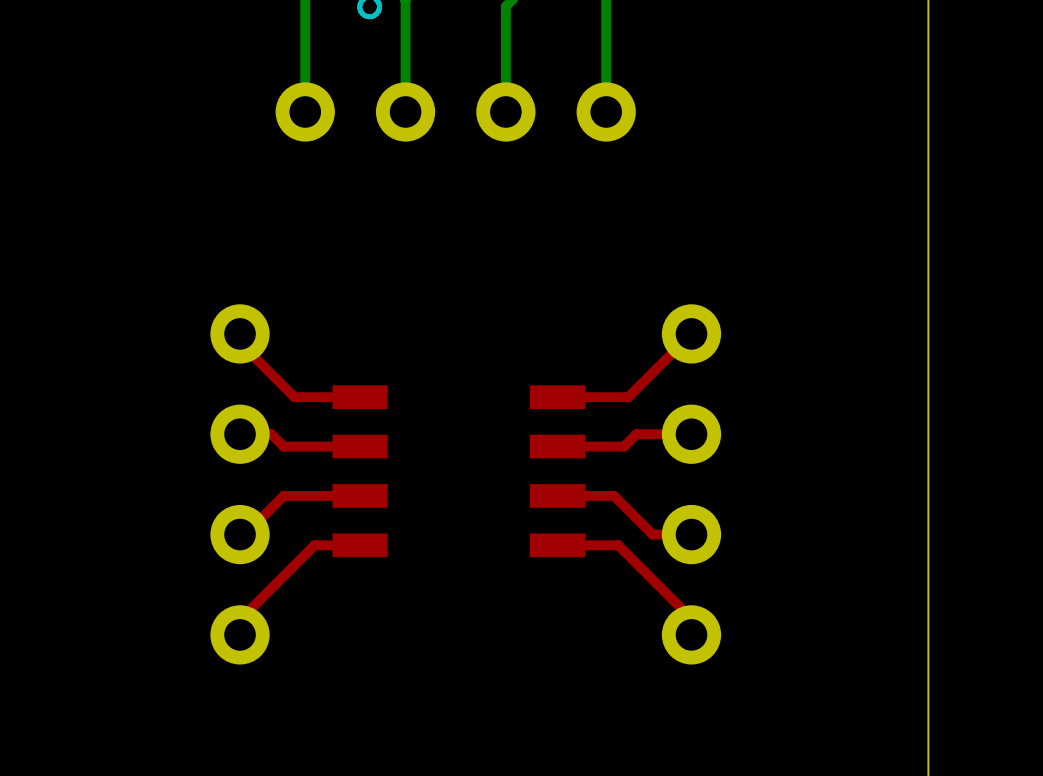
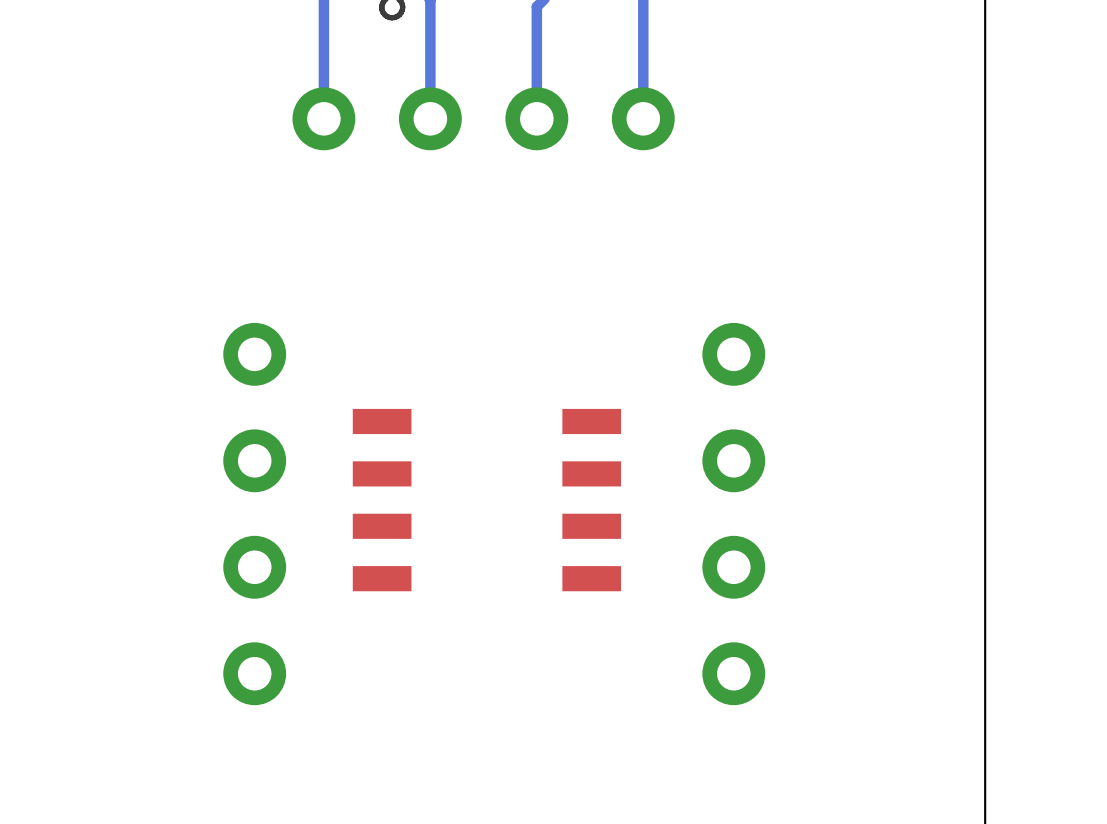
top track: (240, 333) (240, 342) (294, 397) (360, 397) -> none
top track: (691, 333) (628, 397) (557, 397) -> none
top track: (240, 434) (271, 434) (283, 446) (360, 446) -> none
top track: (691, 434) (636, 434) (623, 446) (557, 446) -> none
top track: (360, 495) (283, 495) (245, 534) (240, 534) -> none
top track: (557, 495) (613, 495) (652, 534) (691, 534) -> none
top track: (360, 545) (314, 545) (240, 619) (240, 634) -> none
top track: (557, 545) (618, 545) (691, 618) (691, 634) -> none

